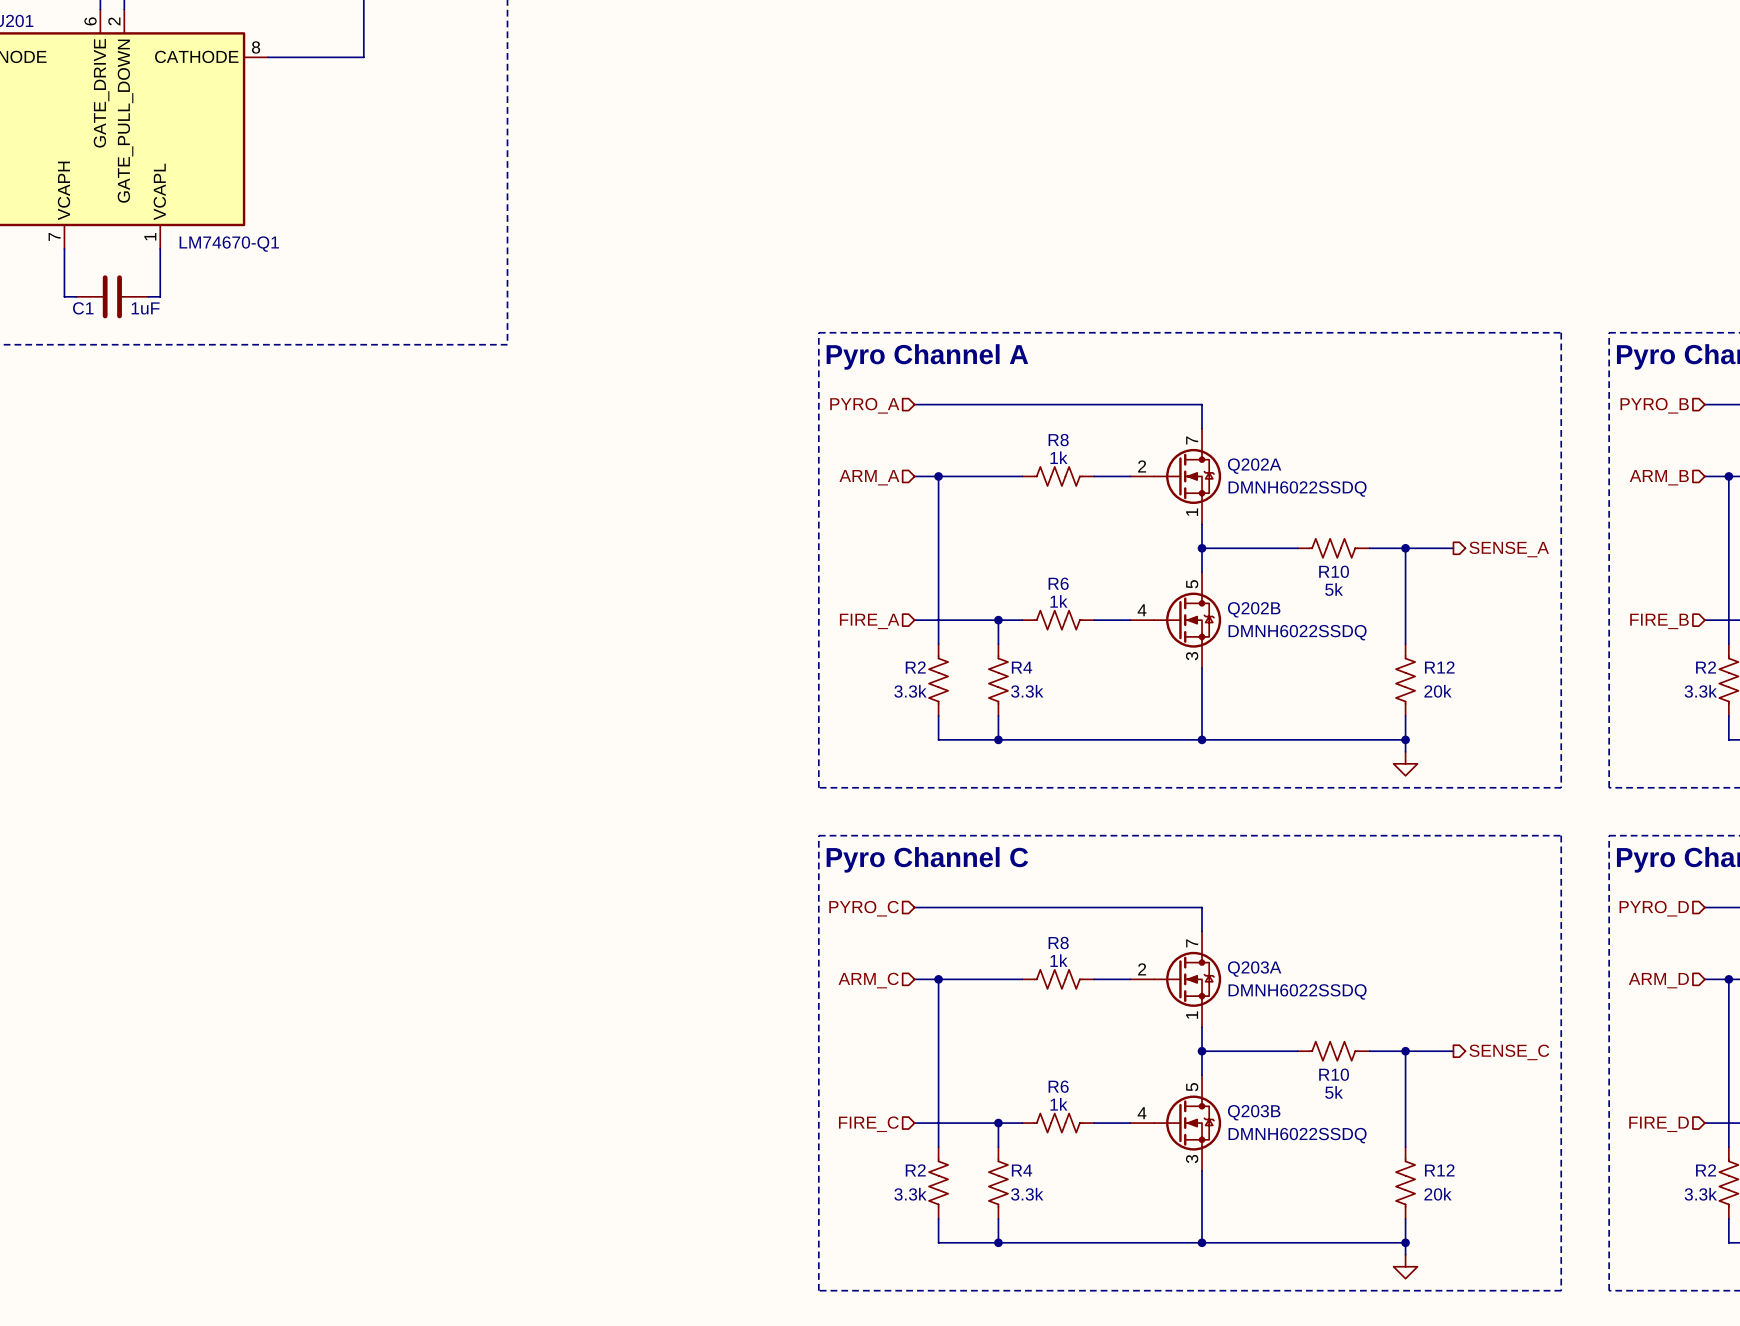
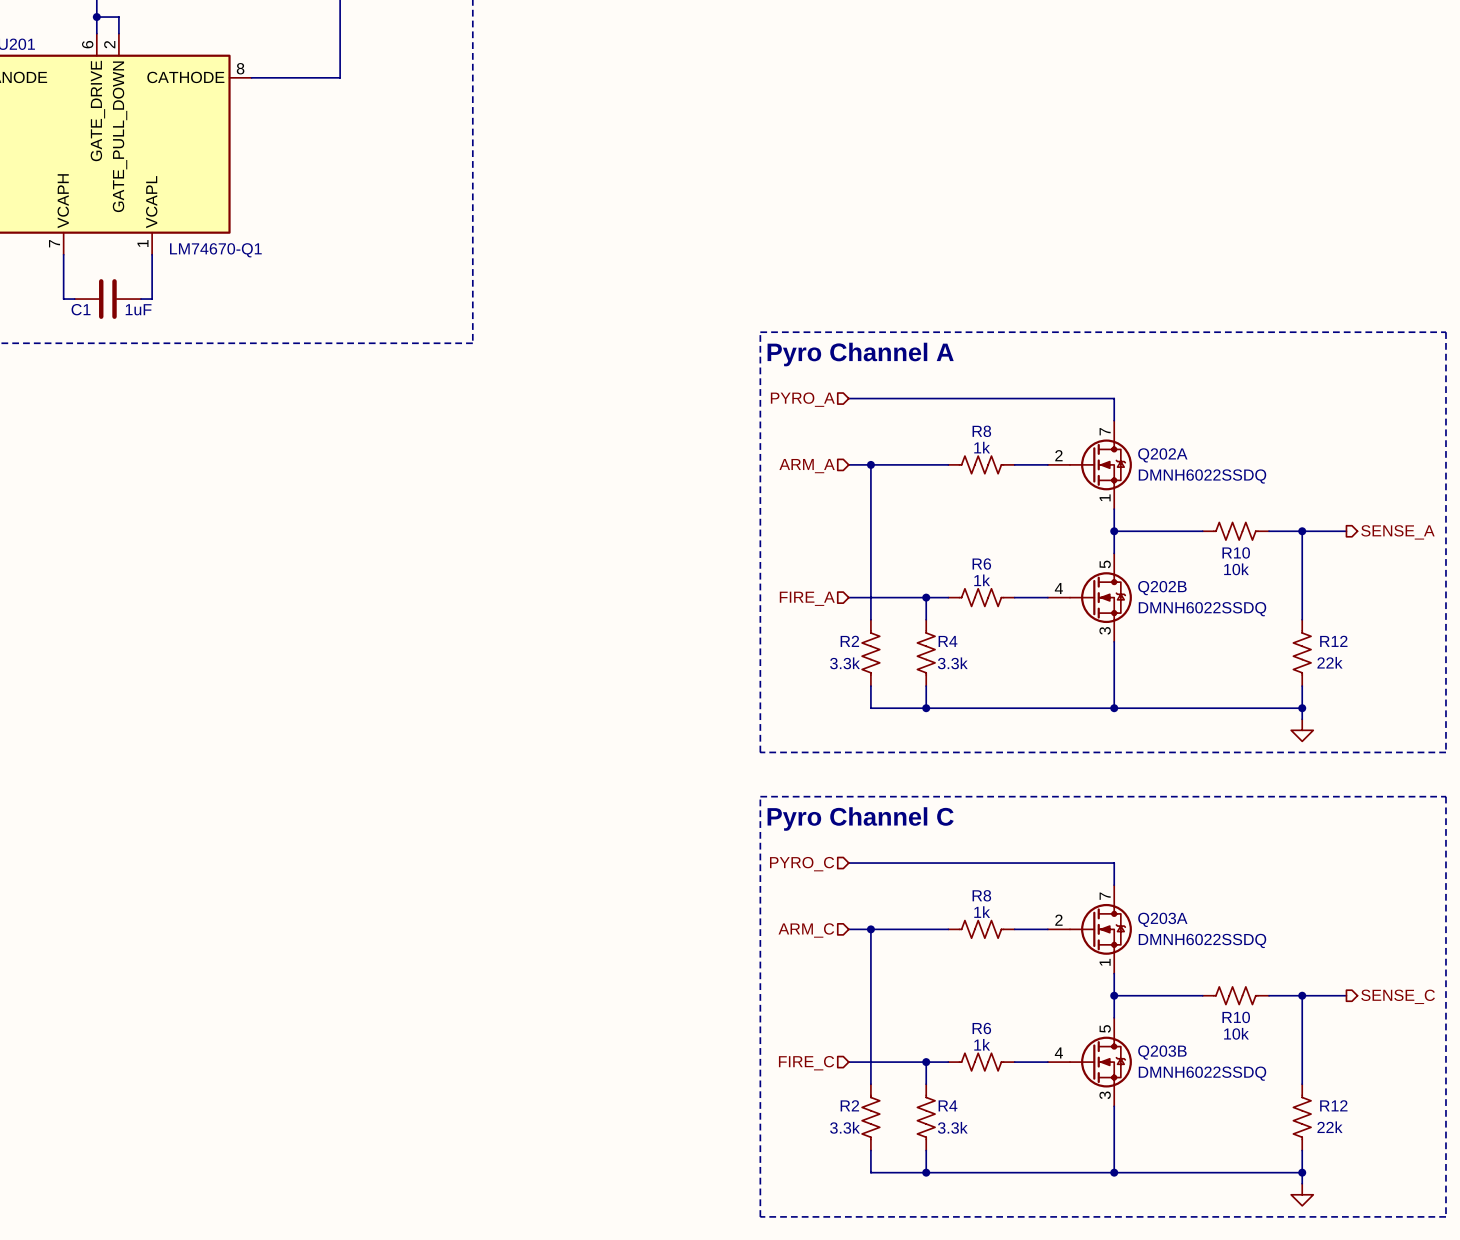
R10 value: 5k (1334, 589) -> 10k (1236, 569)
R12 value: 20k (1438, 691) -> 22k (1329, 662)
R10 value: 5k (1334, 1092) -> 10k (1236, 1033)
R12 value: 20k (1438, 1194) -> 22k (1329, 1127)

